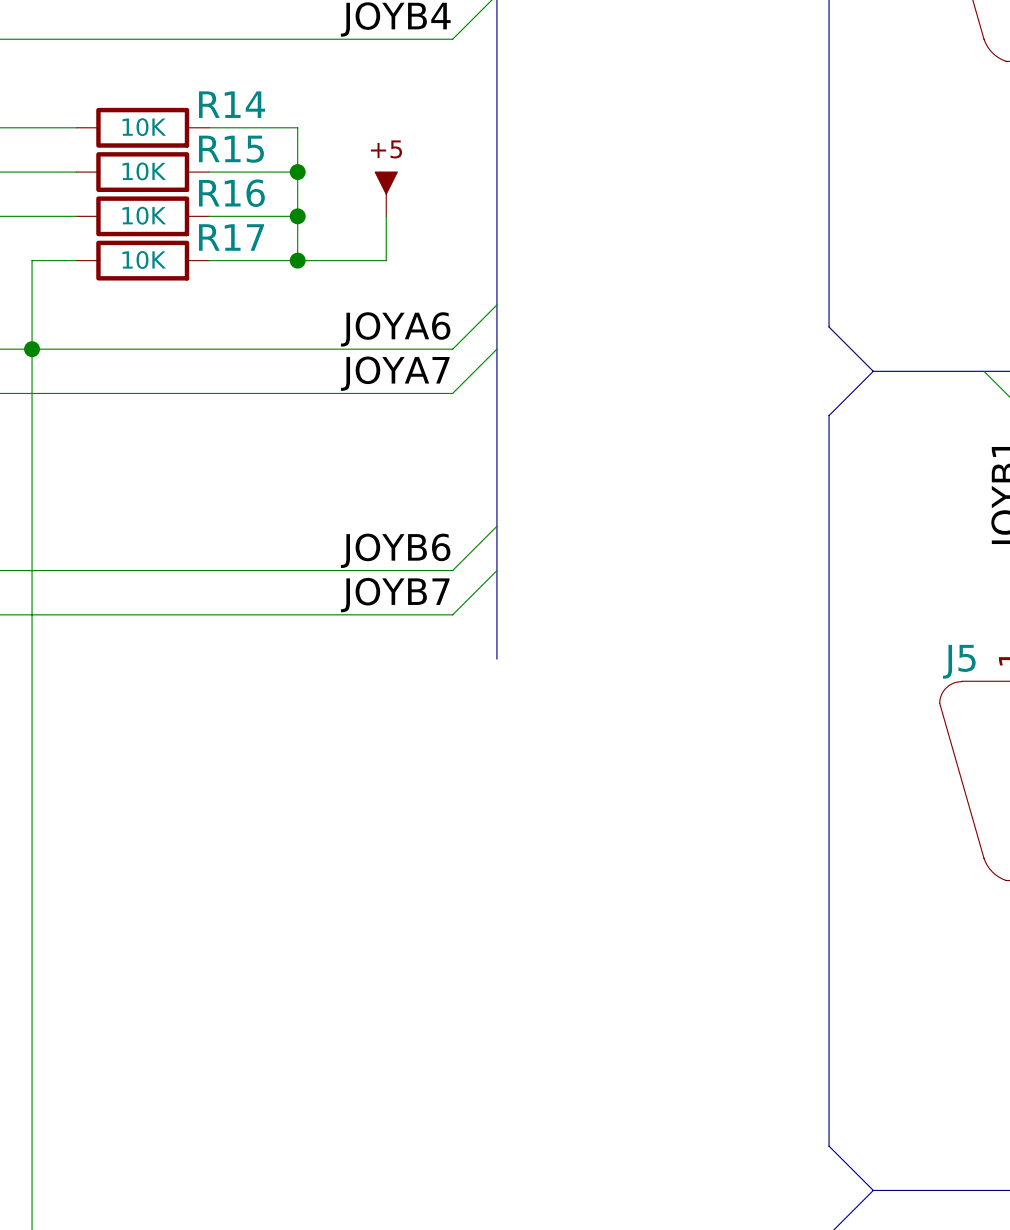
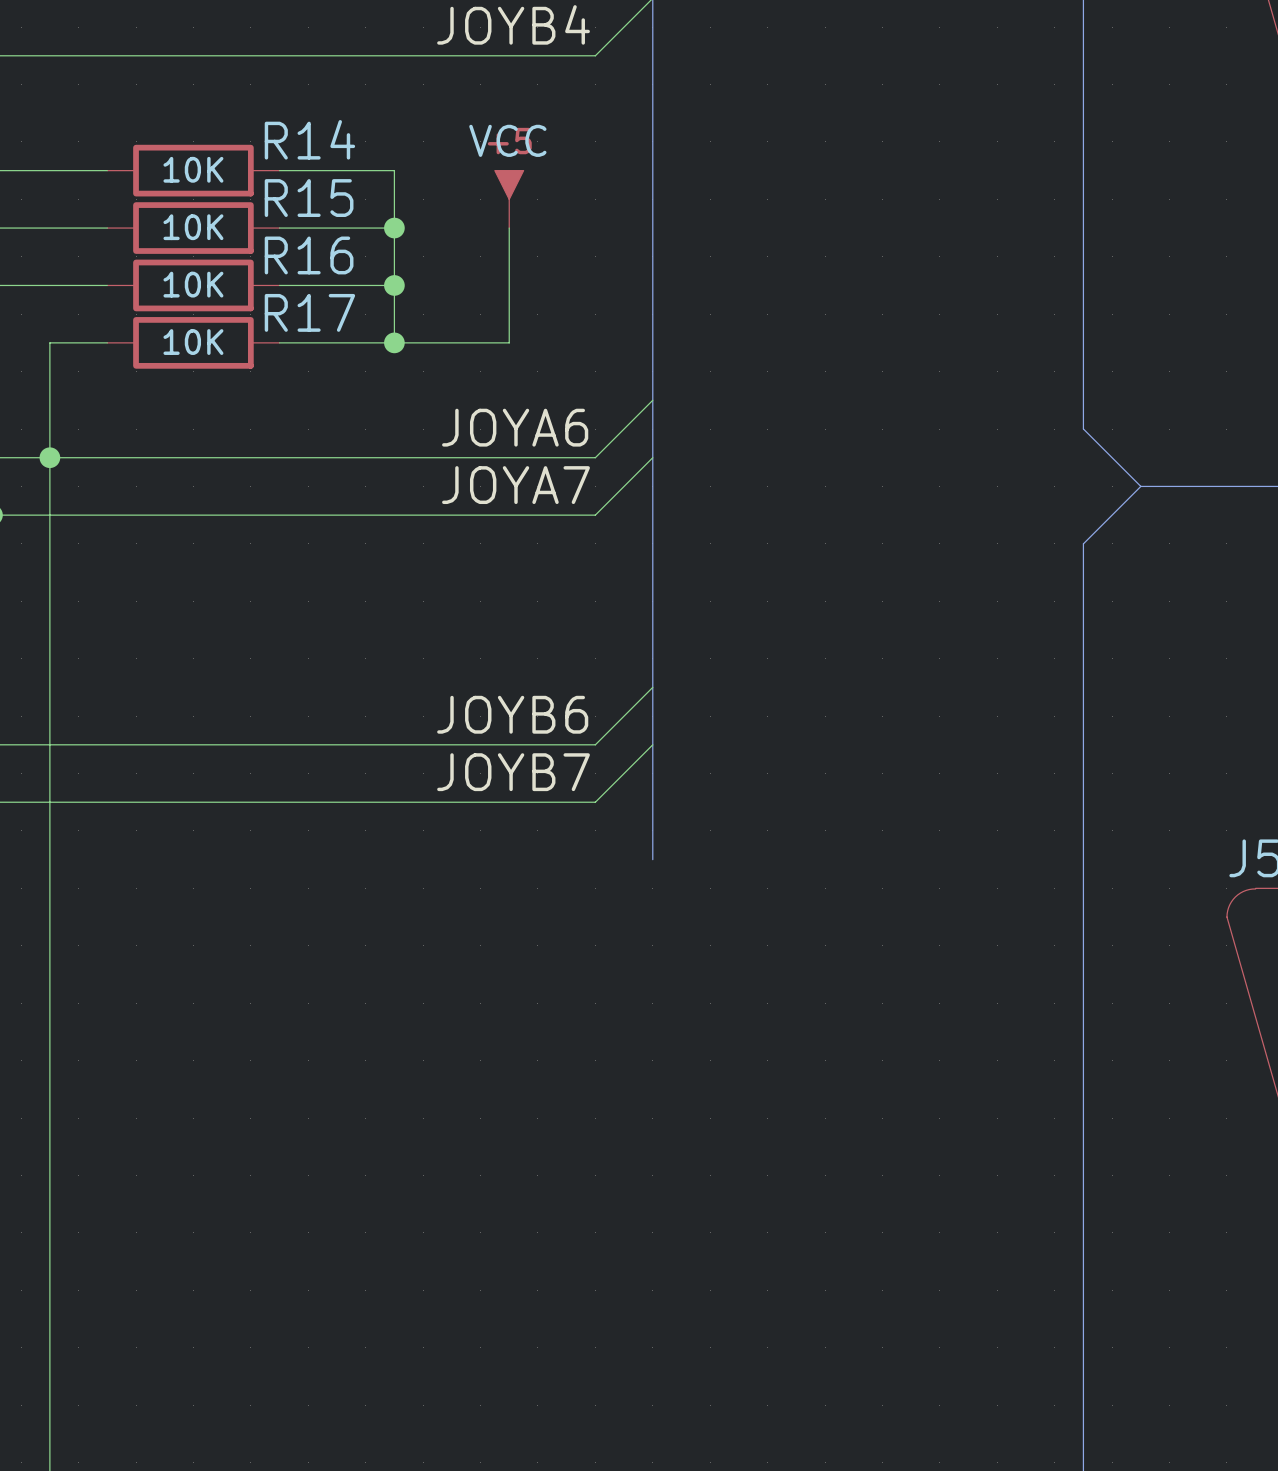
power symbol: none -> VCC (509, 199)
power symbol: (386, 194) -> none

